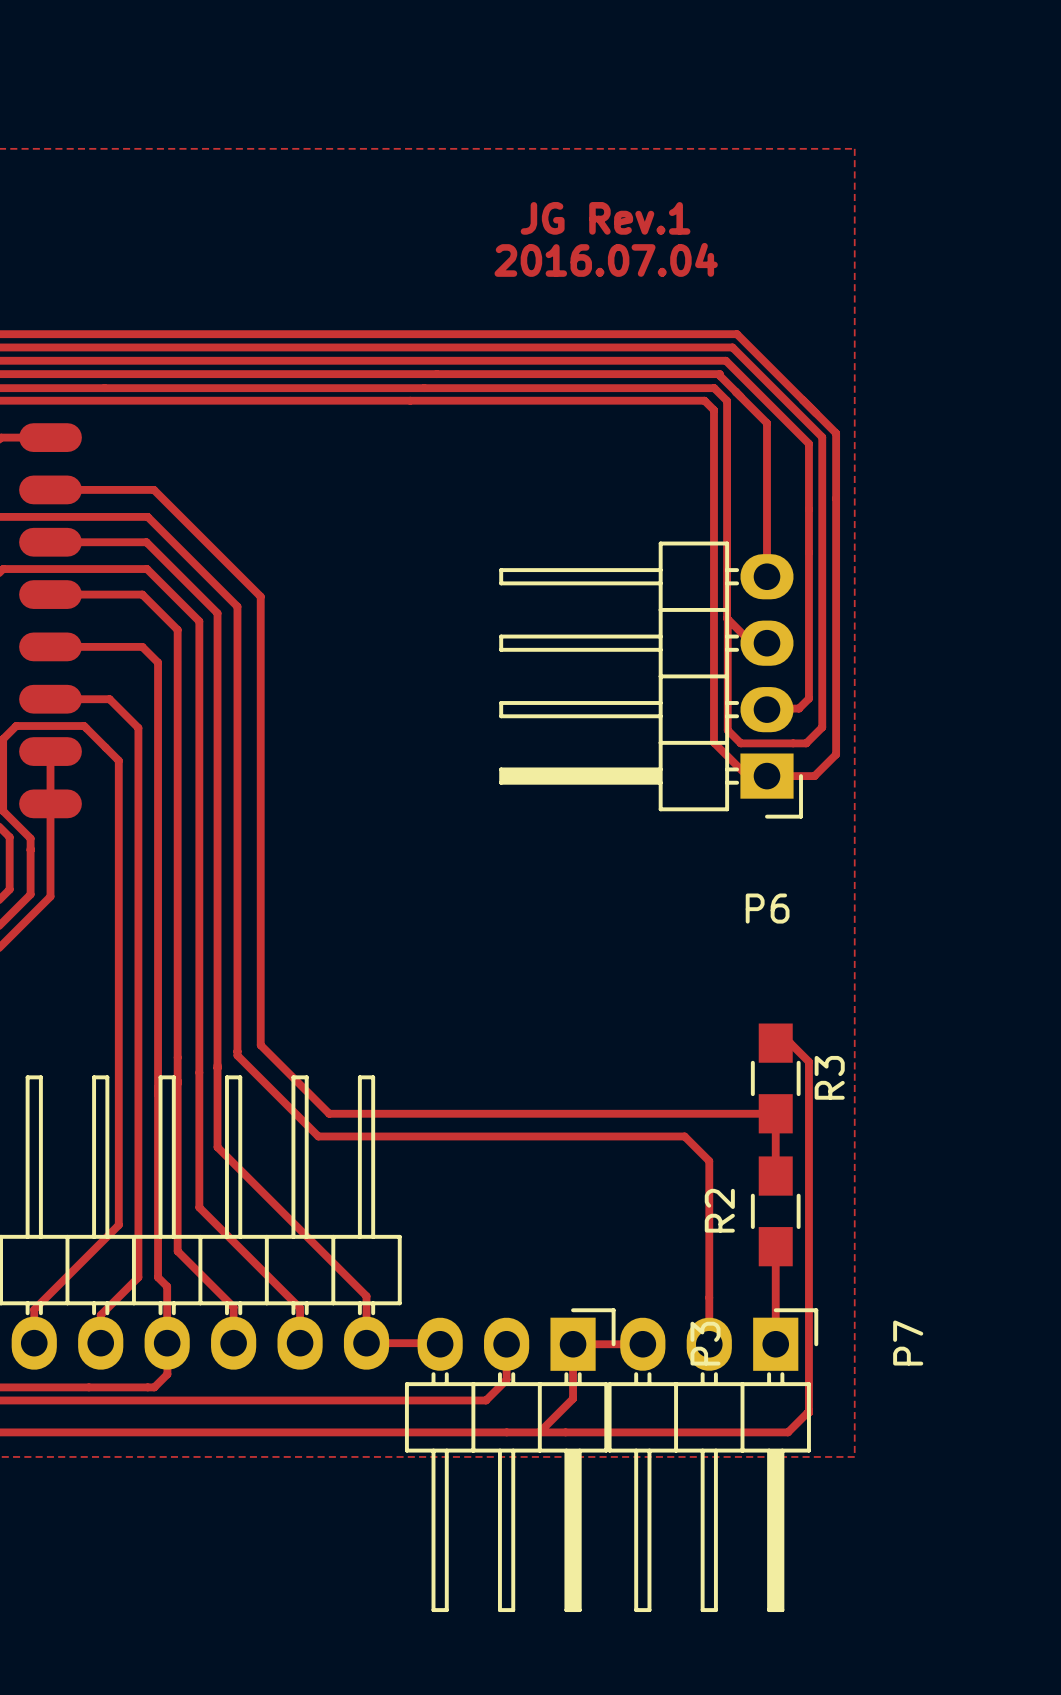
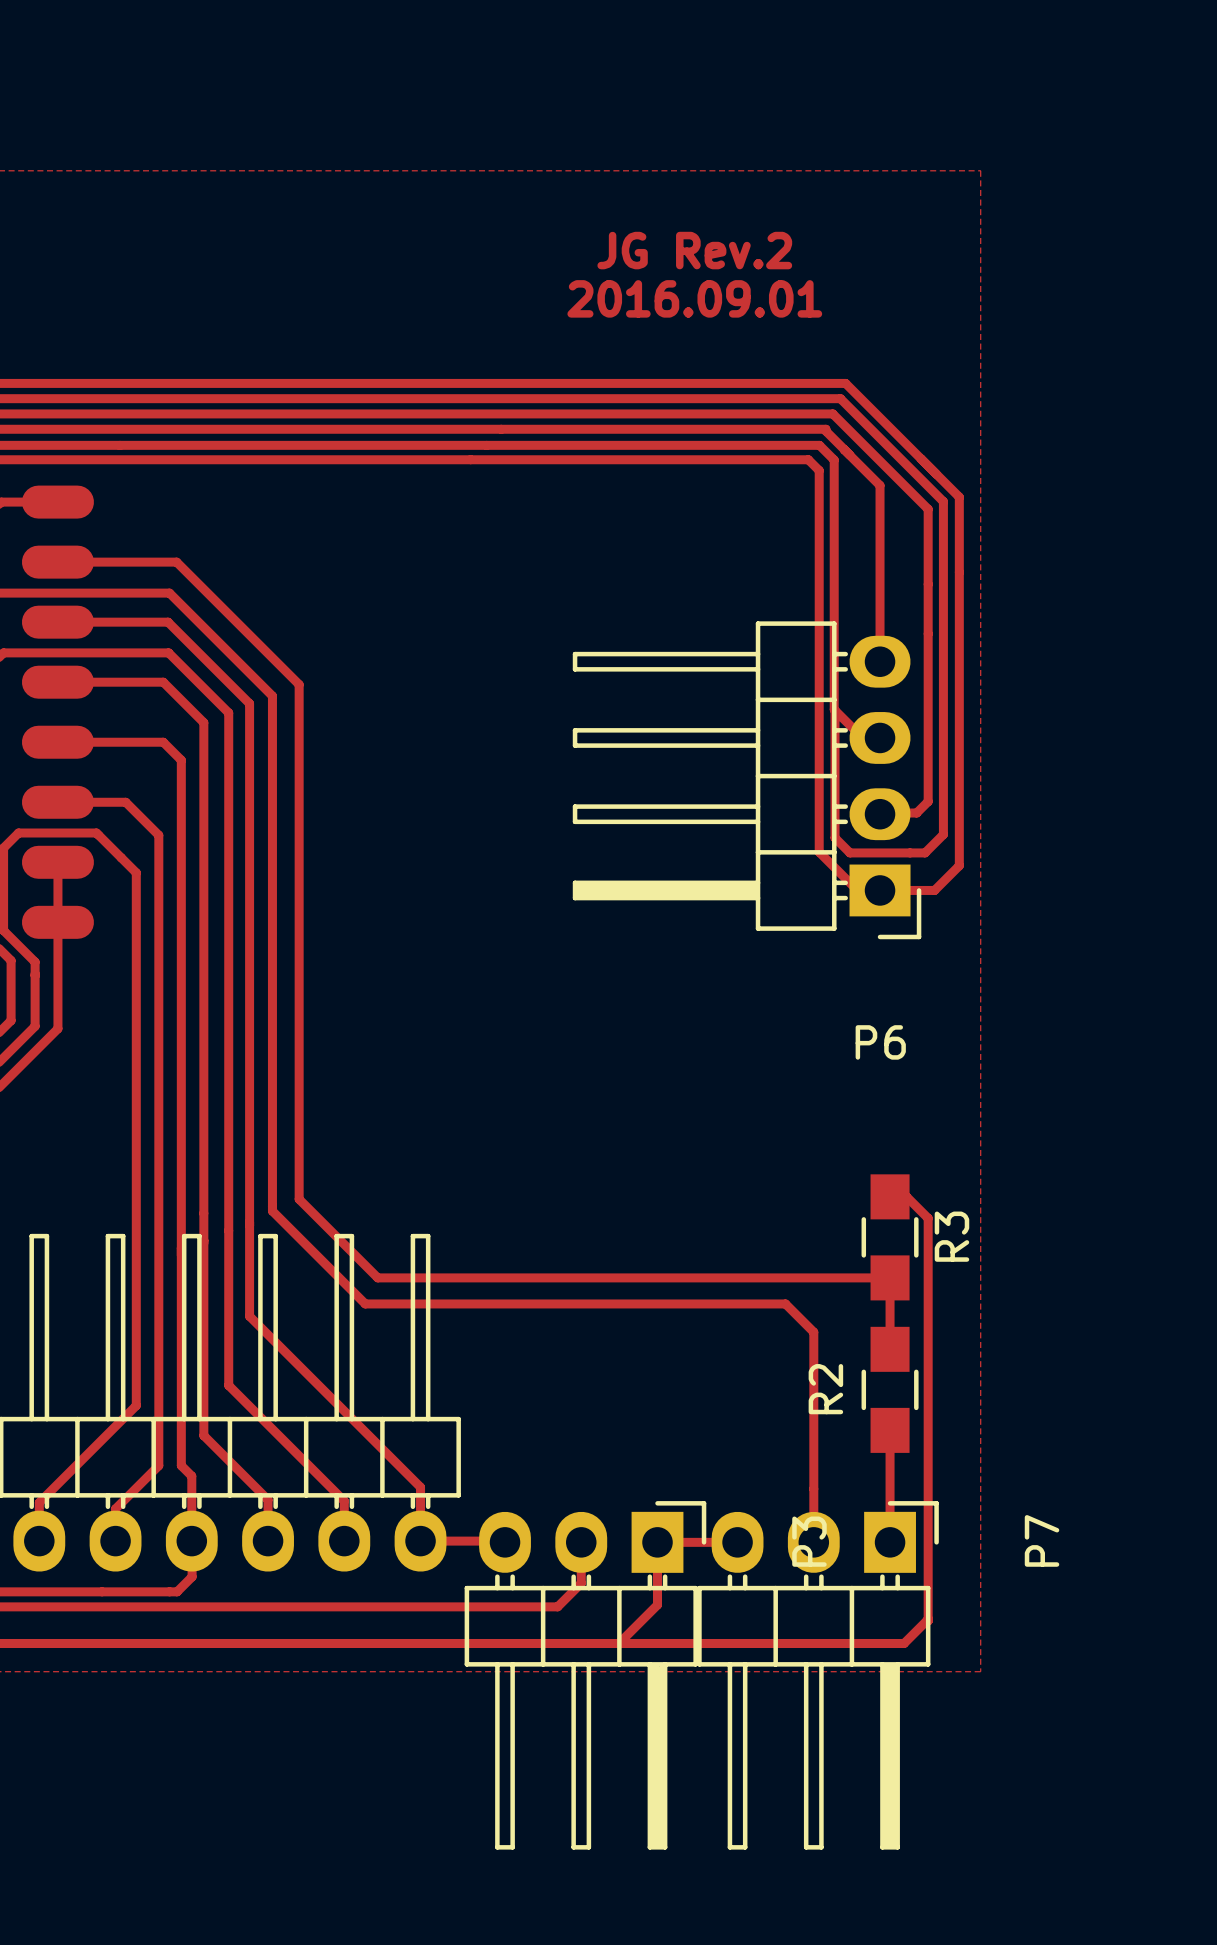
text: JG Rev.1 (605, 218) -> JG Rev.2 (694, 250)
text: 2016.07.04 (606, 259) -> 2016.09.01 (694, 298)

